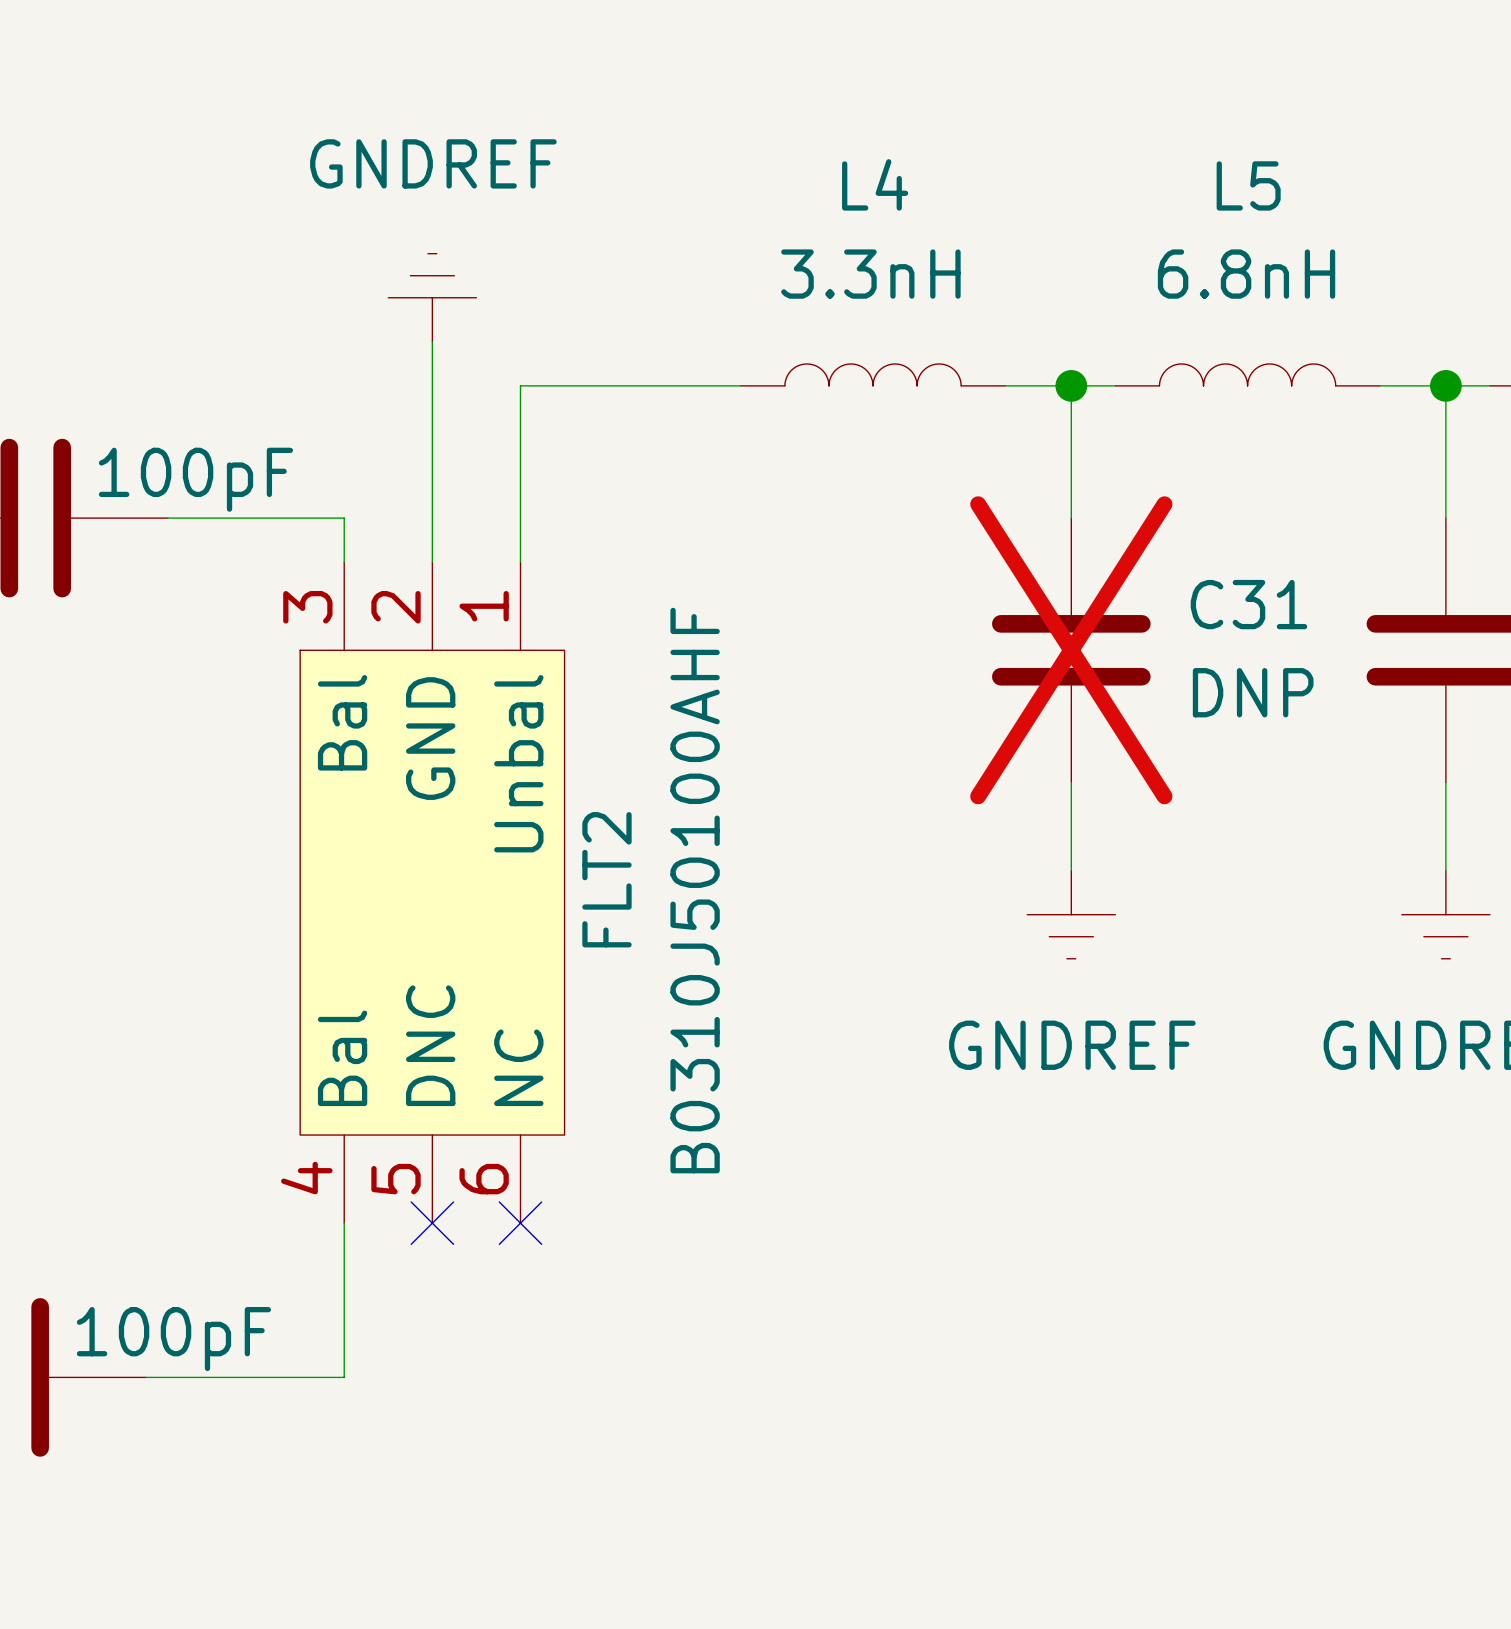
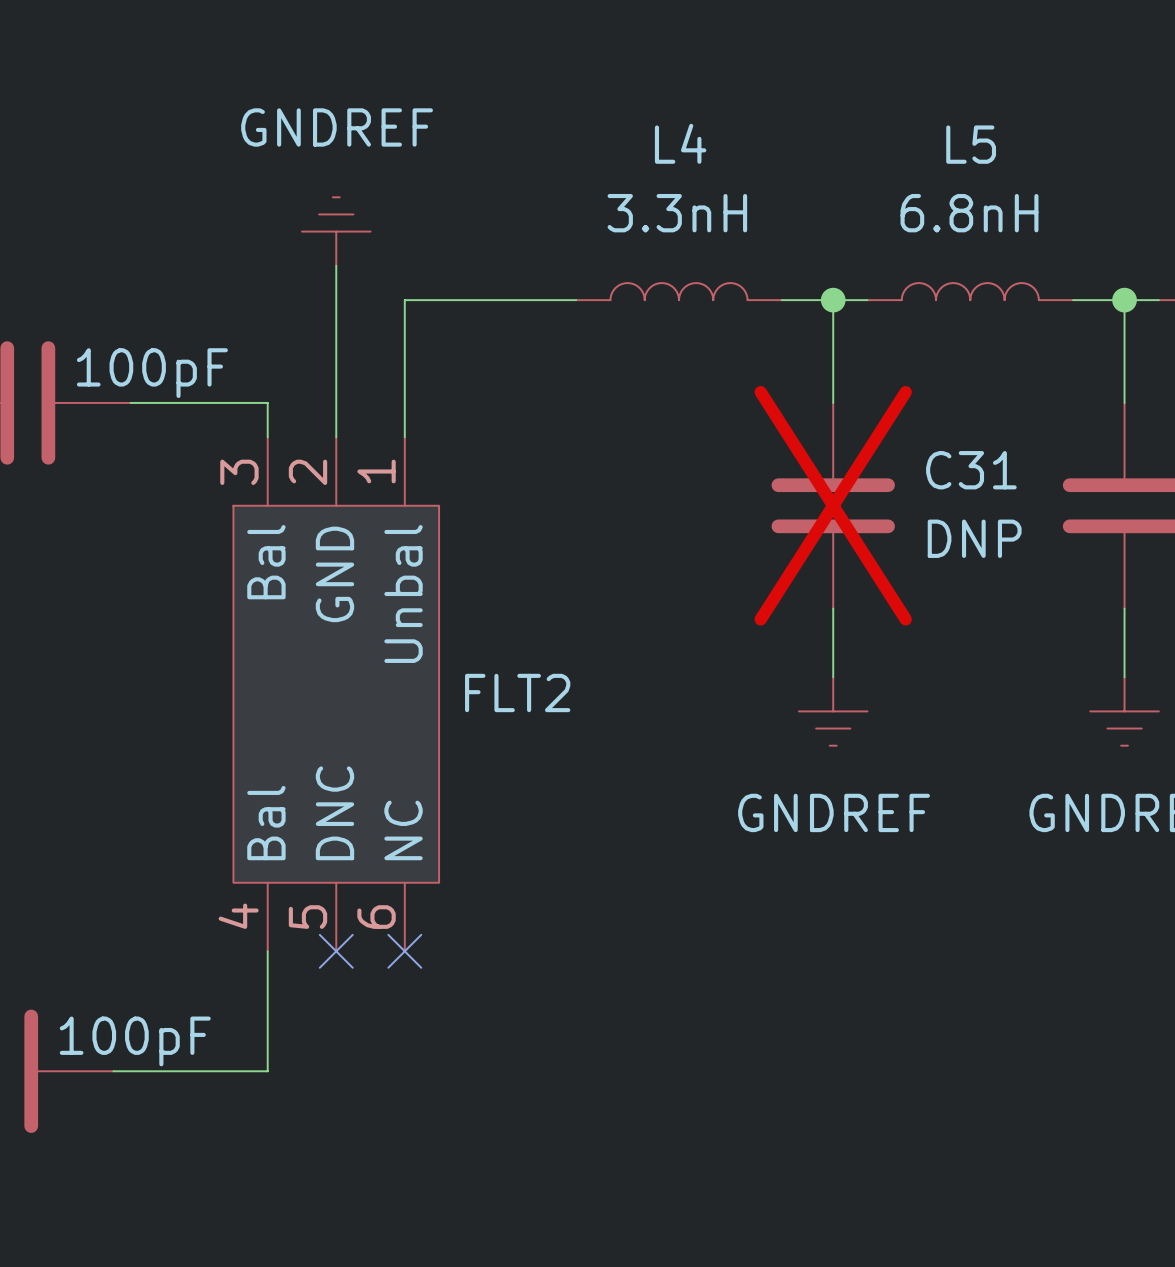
FLT2 name rotation: 0° (606, 879) -> 90° clockwise (517, 692)
FLT2 value: B0310J50100AHF (695, 890) -> none

